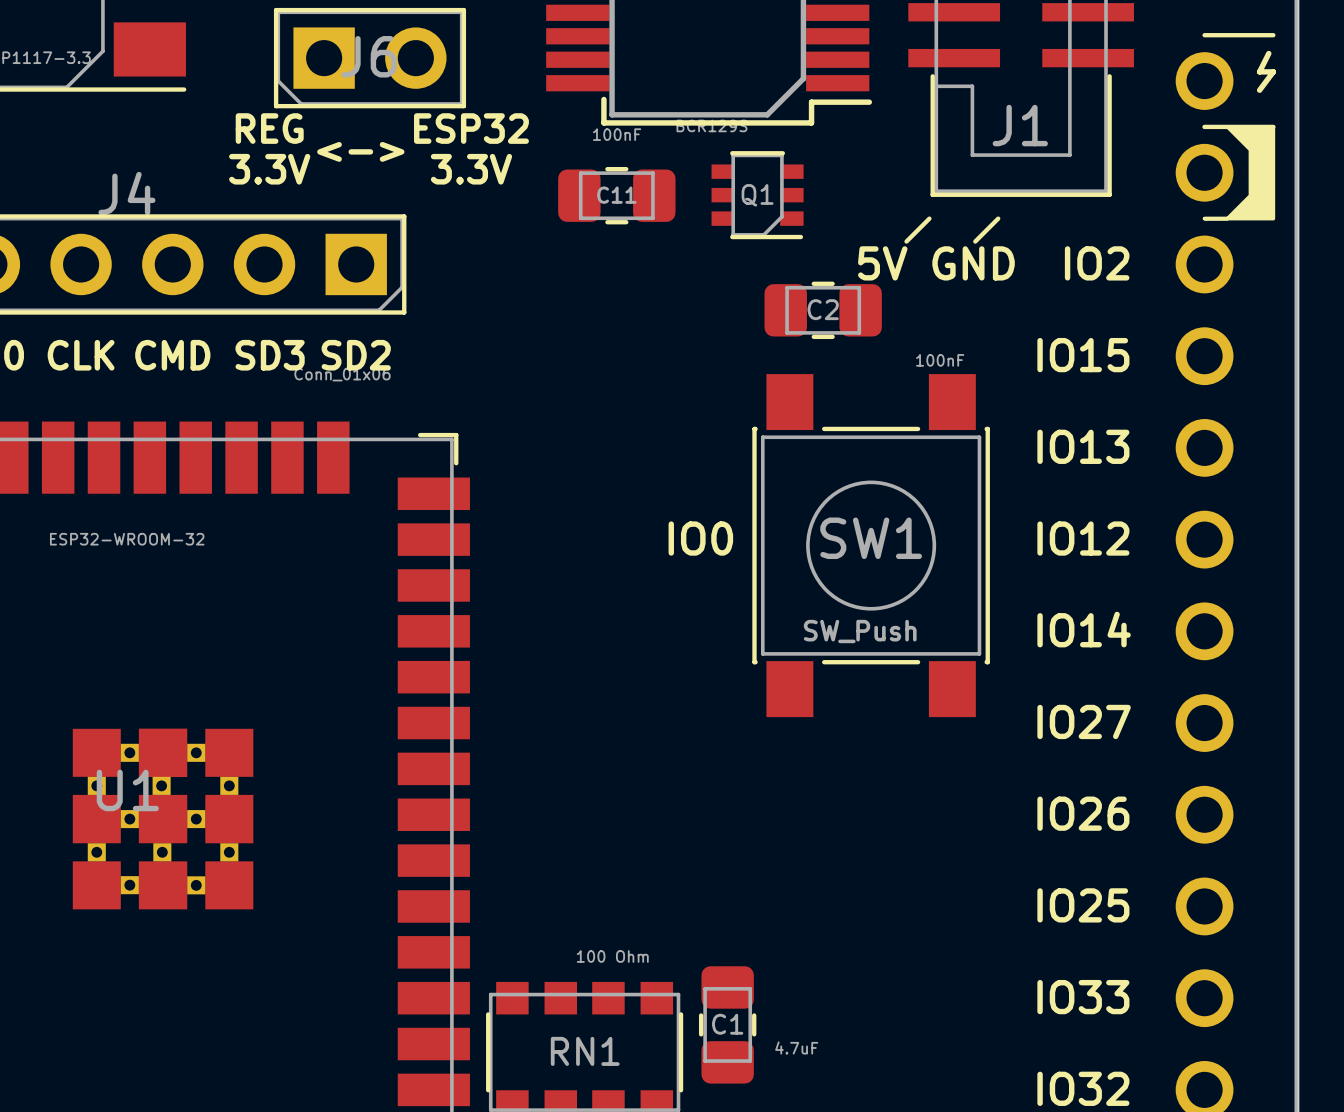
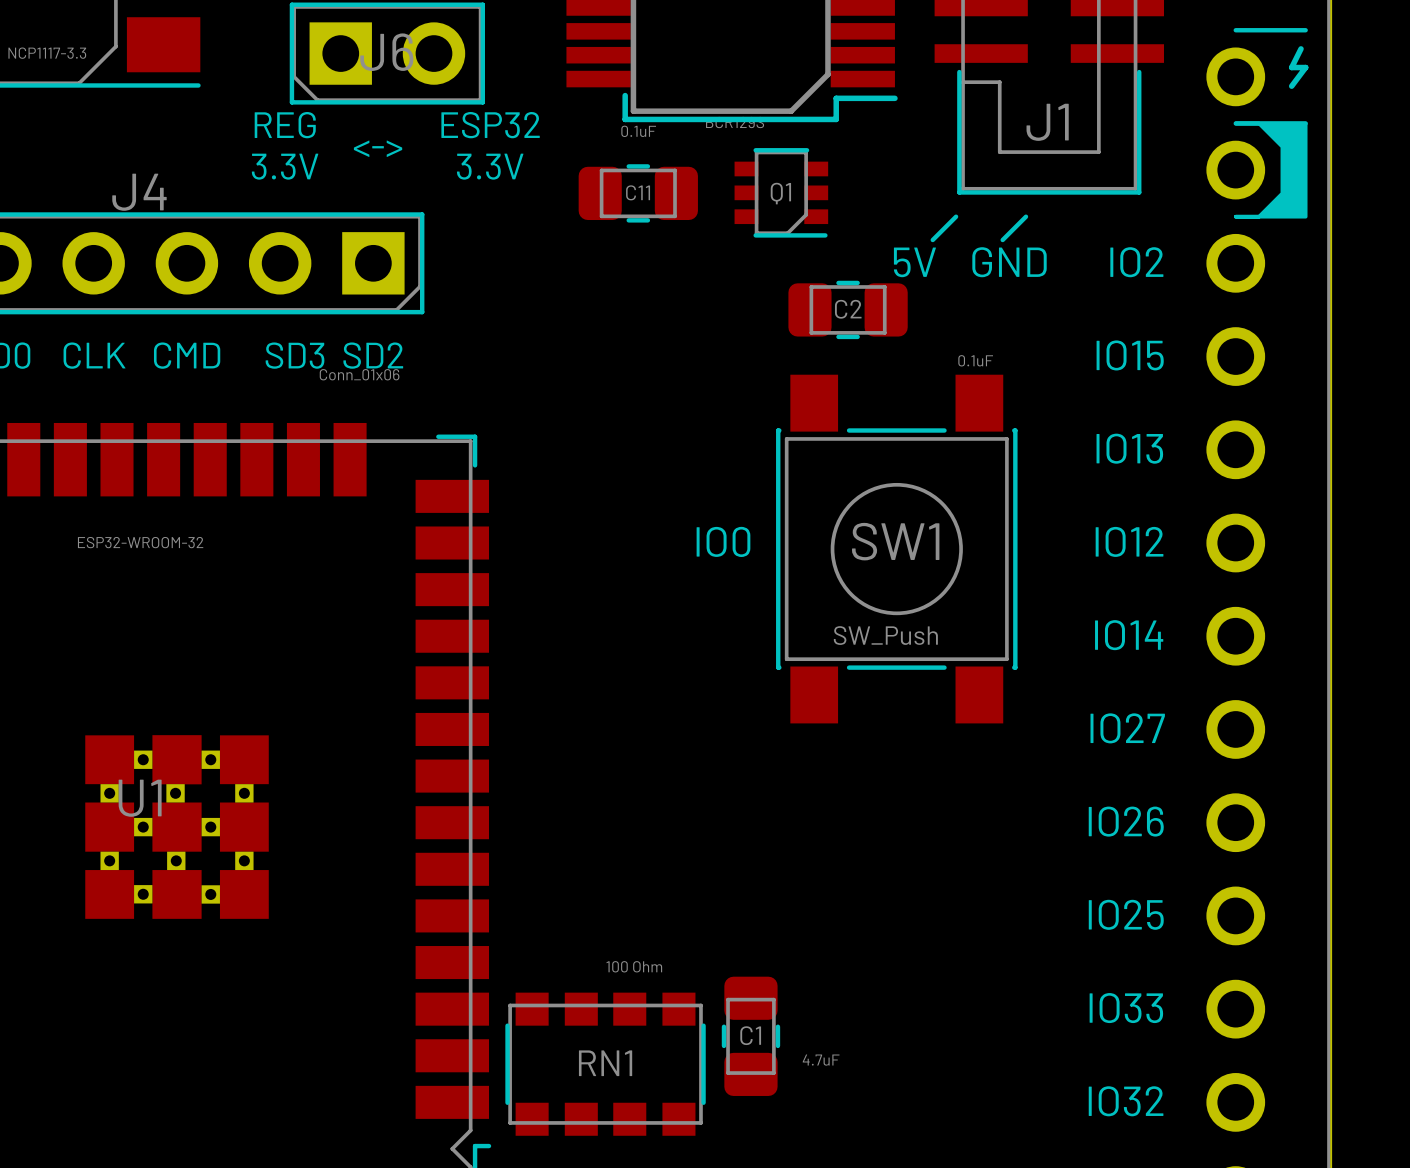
C11 value: 100nF (617, 134) -> 0.1uF (638, 131)
C2 value: 100nF (940, 360) -> 0.1uF (975, 360)

